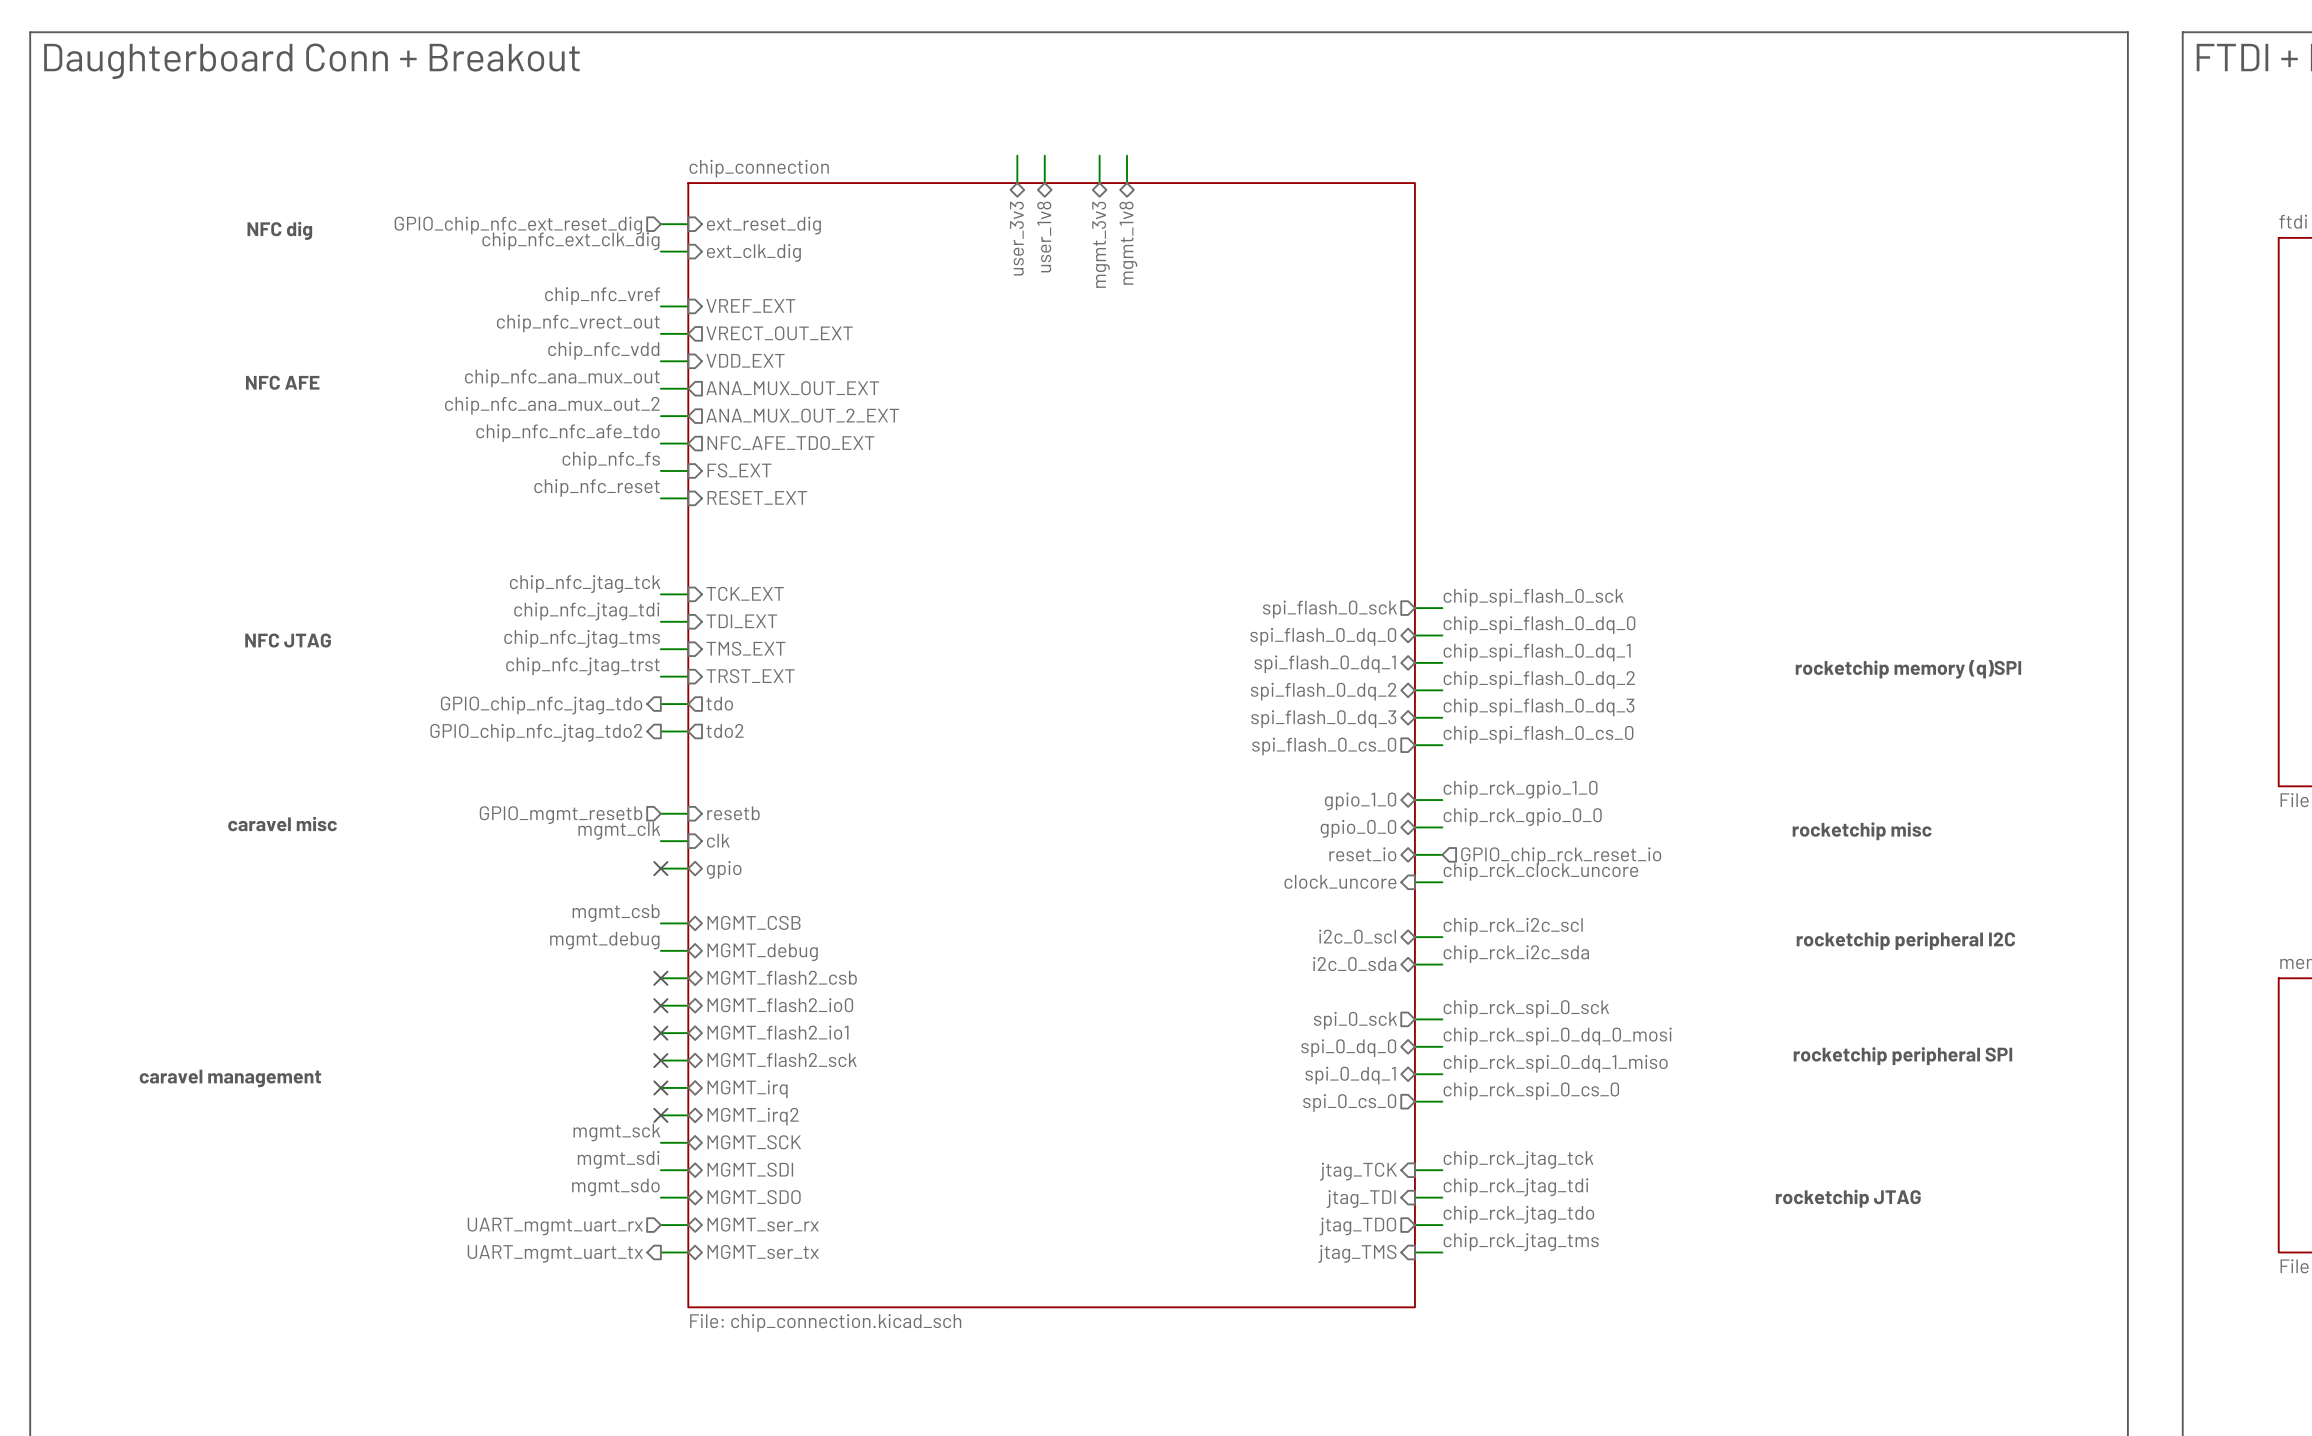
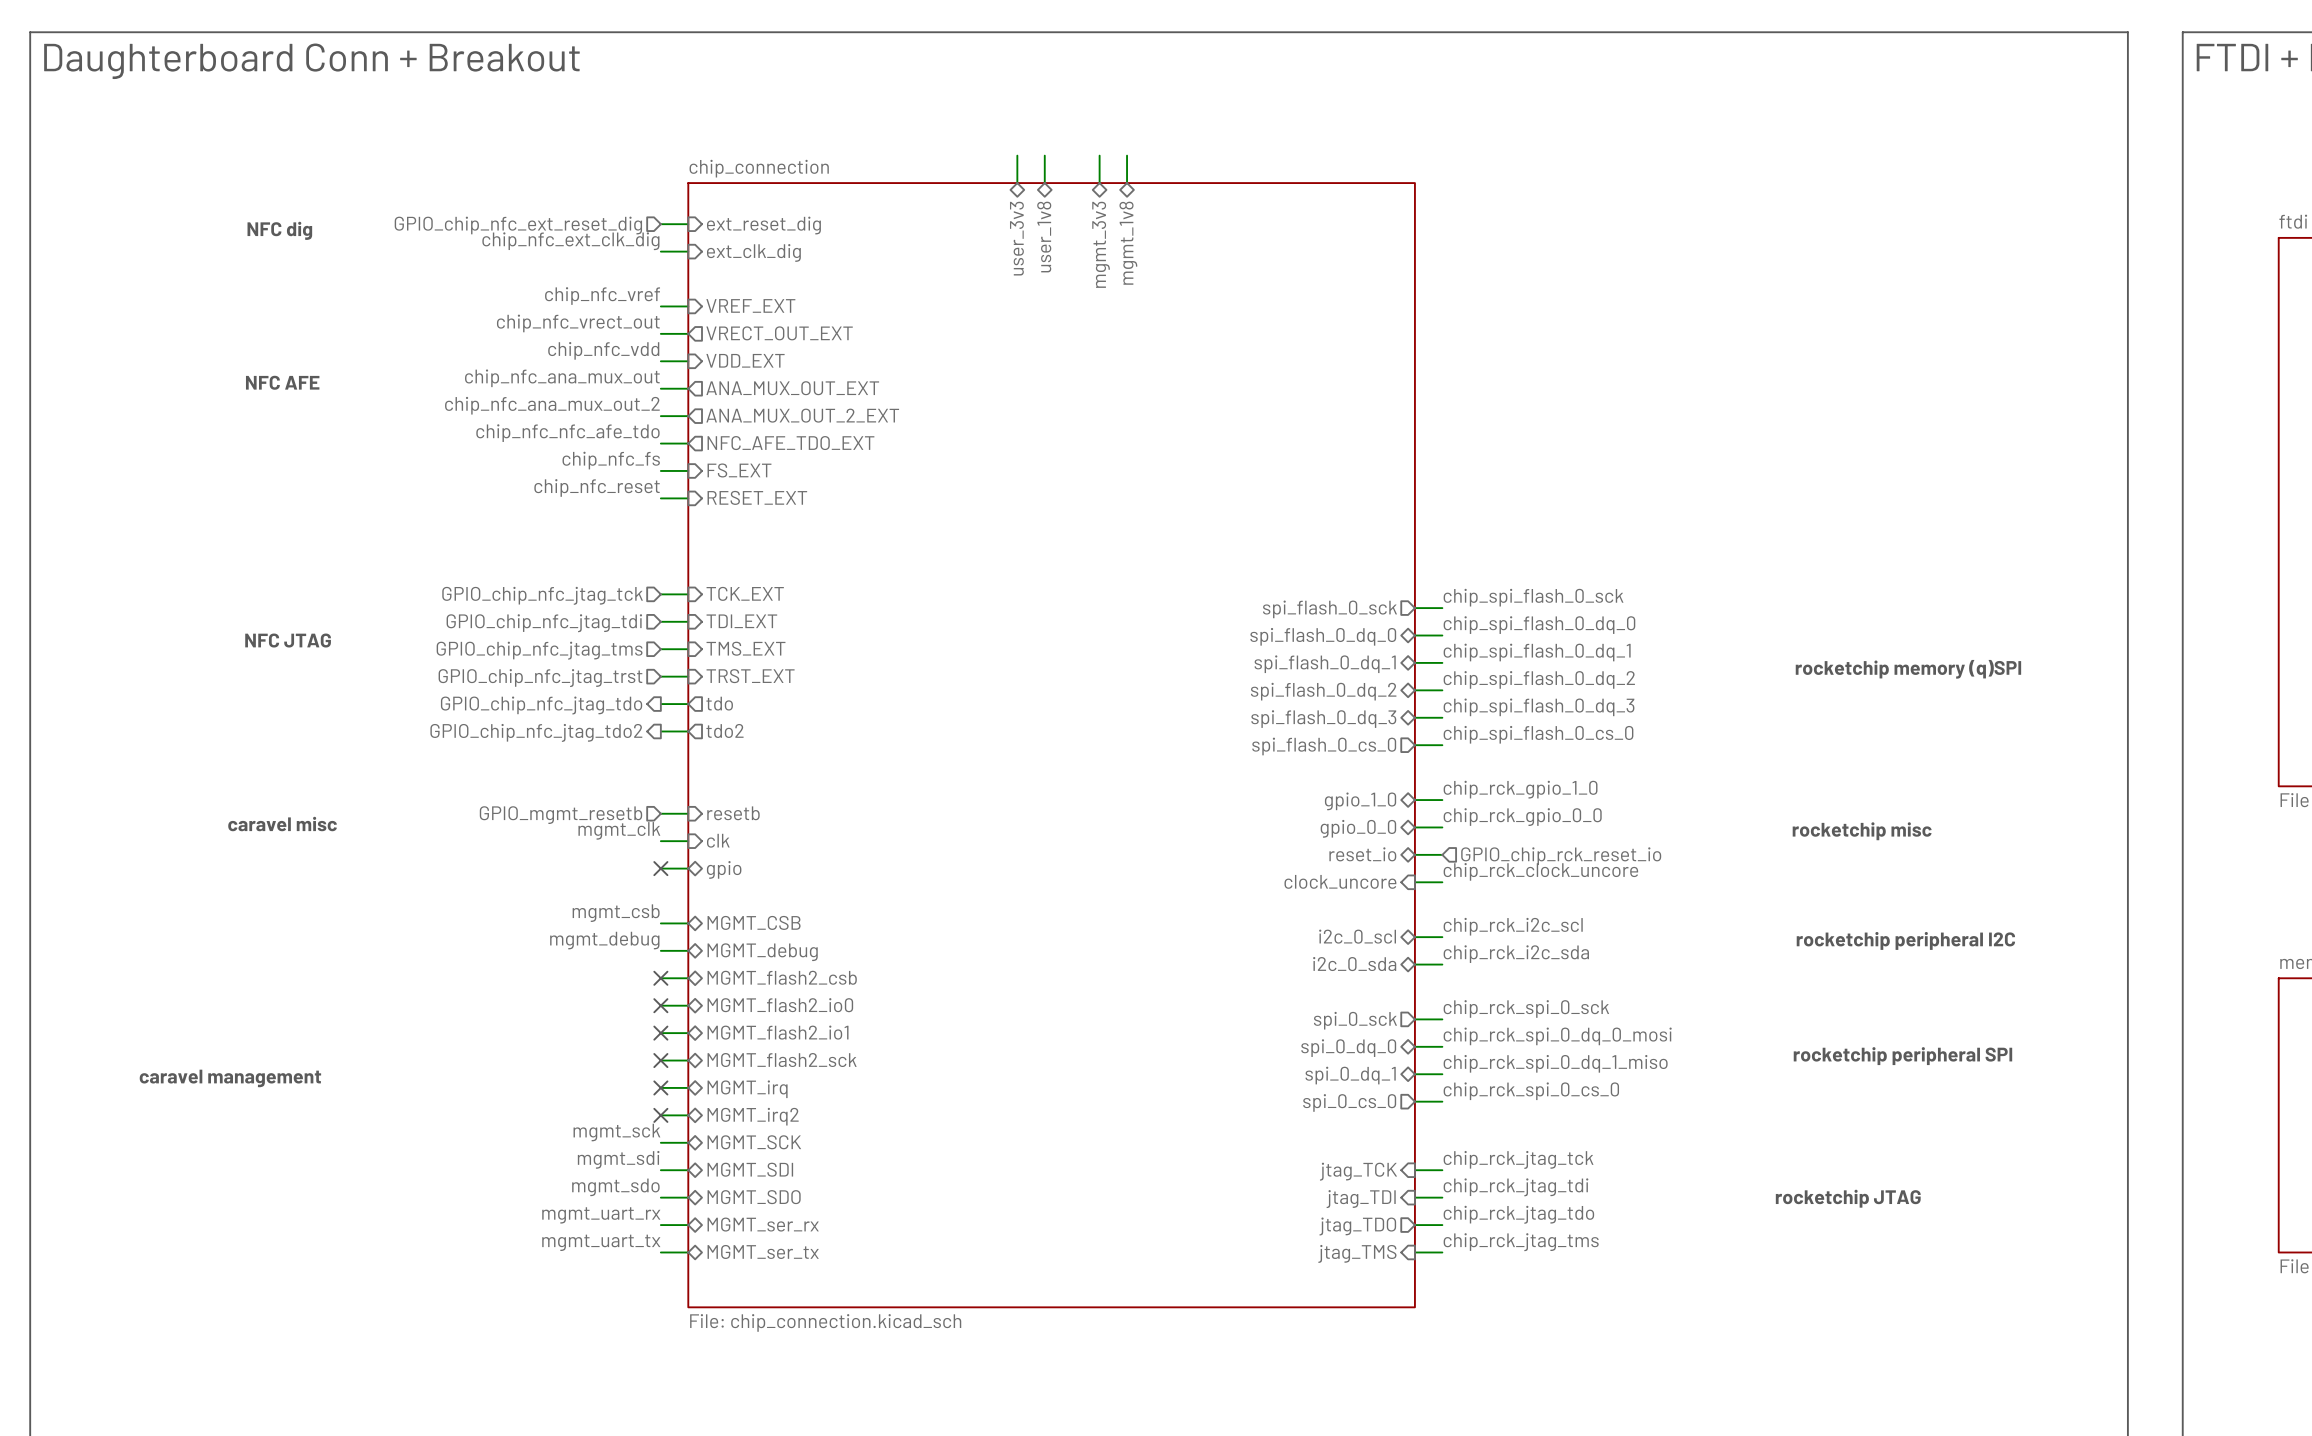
label: chip_nfc_jtag_tck (585, 584) -> none
hierarchical label: none -> GPIO_chip_nfc_jtag_tck (542, 595)
label: chip_nfc_jtag_tdi (586, 611) -> none
hierarchical label: none -> GPIO_chip_nfc_jtag_tdi (544, 623)
label: chip_nfc_jtag_tms (582, 638) -> none
hierarchical label: none -> GPIO_chip_nfc_jtag_tms (539, 650)
label: chip_nfc_jtag_trst (582, 666) -> none
hierarchical label: none -> GPIO_chip_nfc_jtag_trst (540, 678)
label: none -> mgmt_uart_rx (601, 1215)
hierarchical label: UART_mgmt_uart_rx (555, 1226) -> none
label: none -> mgmt_uart_tx (601, 1242)
hierarchical label: UART_mgmt_uart_tx (555, 1253) -> none

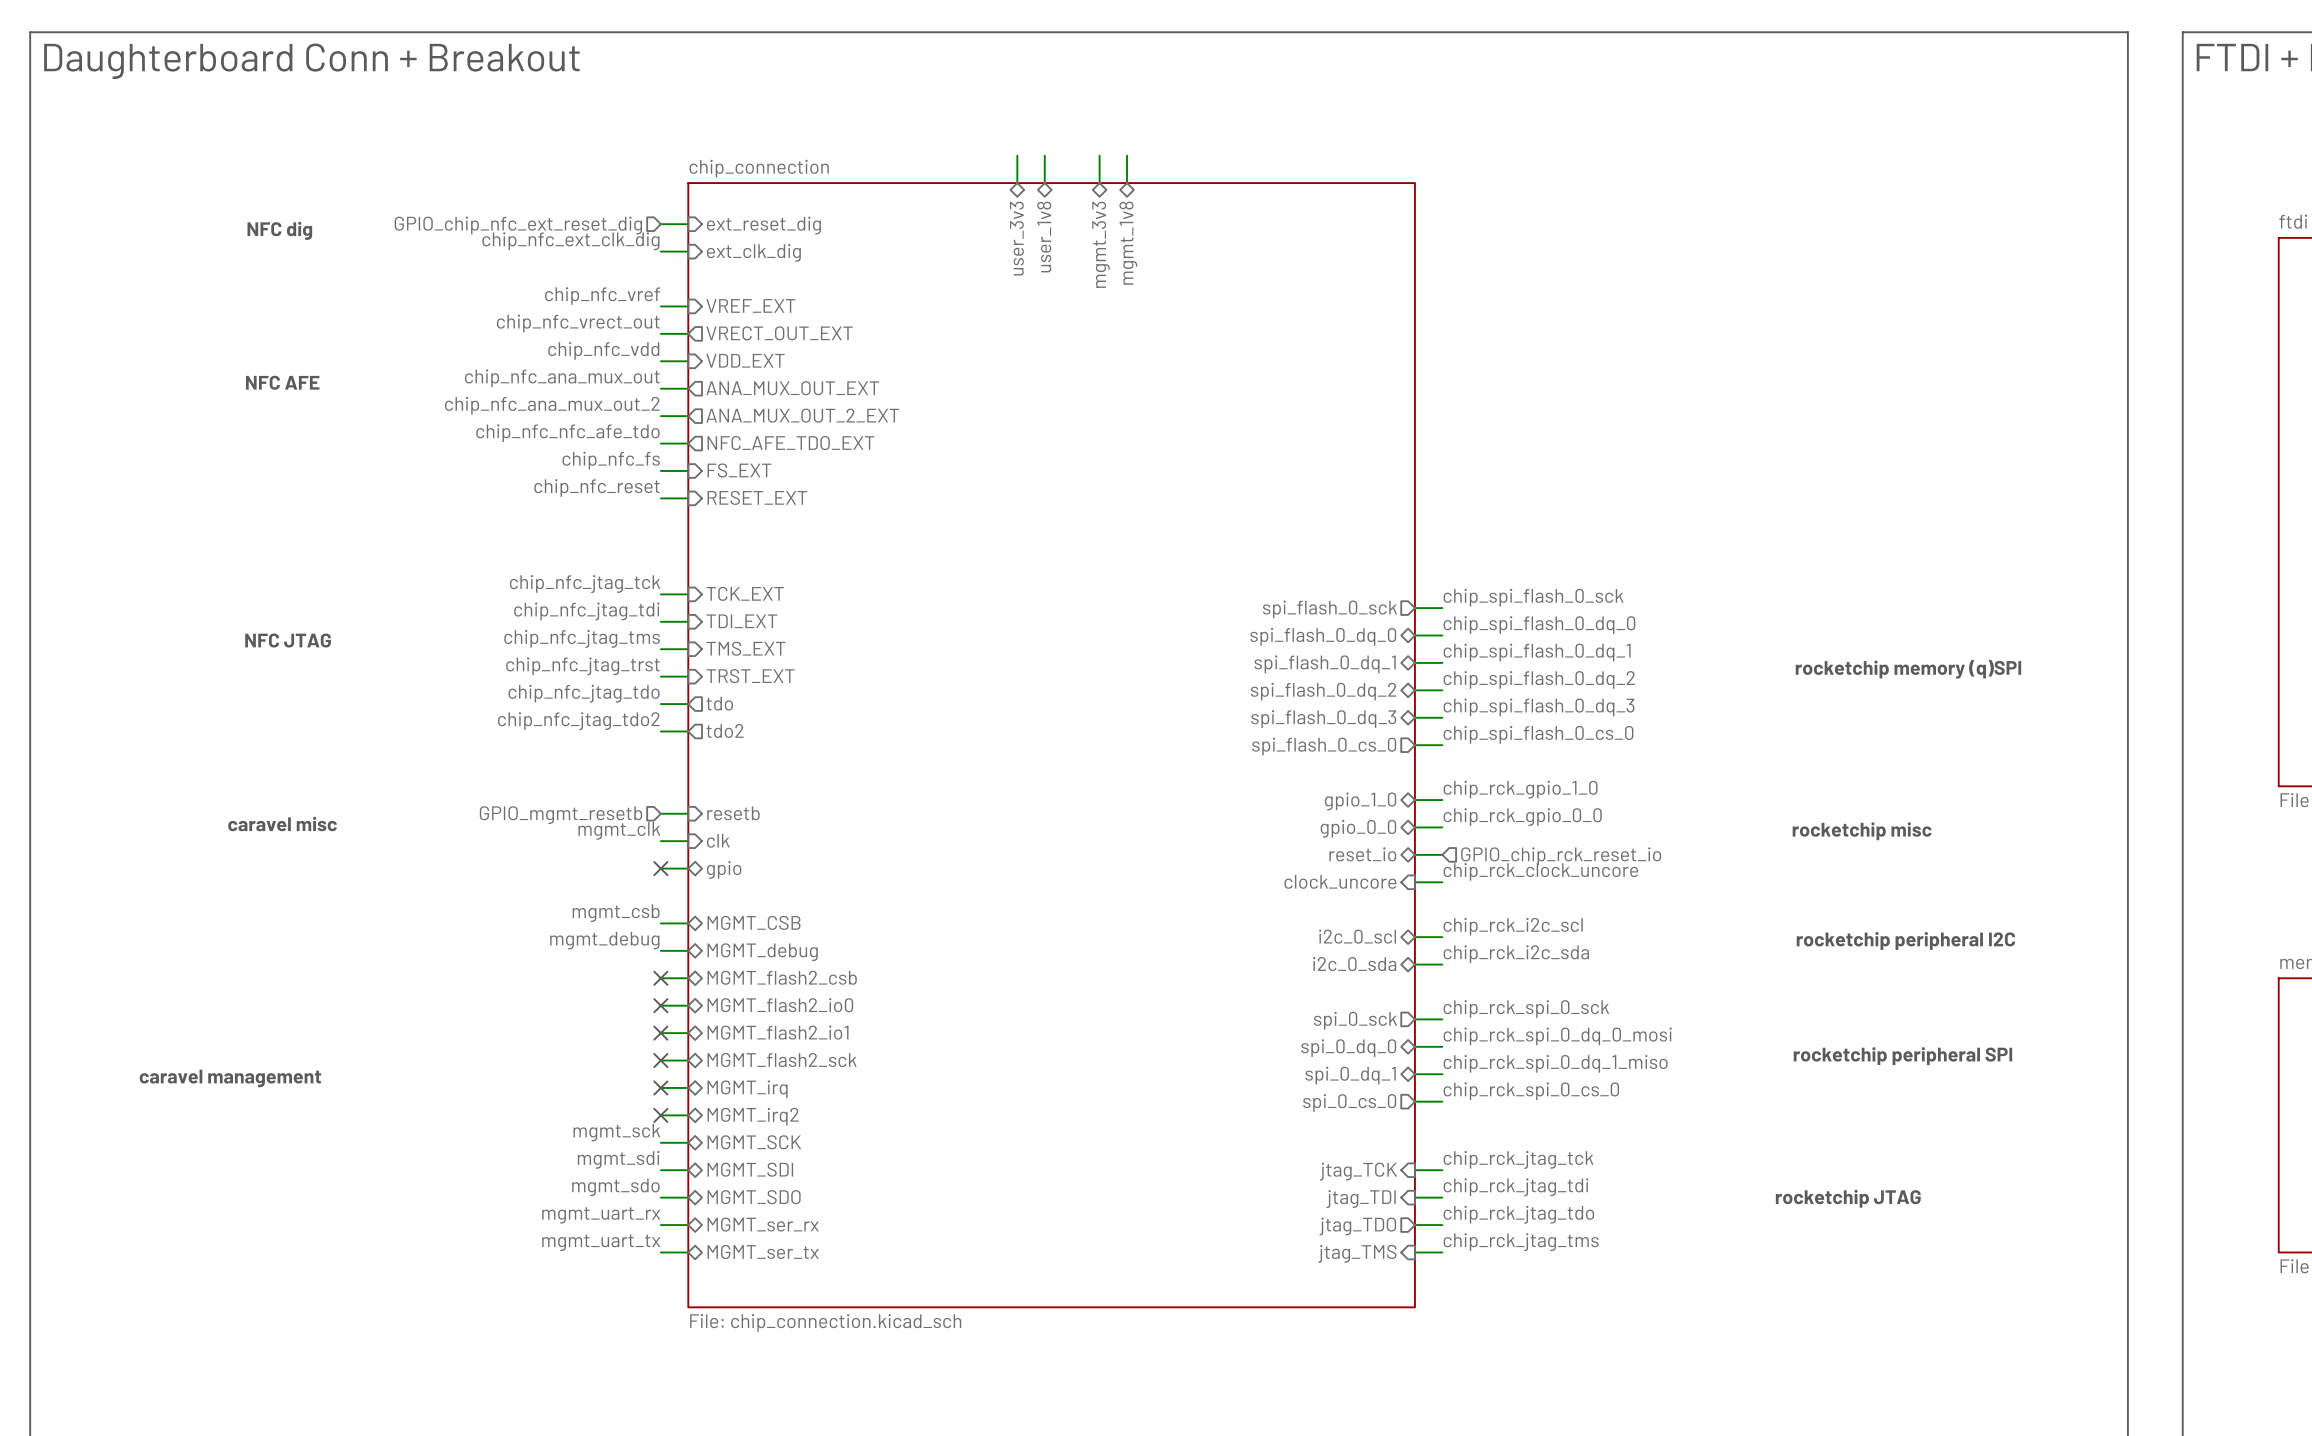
label: none -> chip_nfc_jtag_tck (585, 584)
hierarchical label: GPIO_chip_nfc_jtag_tck (542, 595) -> none
label: none -> chip_nfc_jtag_tdi (586, 611)
hierarchical label: GPIO_chip_nfc_jtag_tdi (544, 623) -> none
label: none -> chip_nfc_jtag_tms (582, 638)
hierarchical label: GPIO_chip_nfc_jtag_tms (539, 650) -> none
label: none -> chip_nfc_jtag_trst (582, 666)
hierarchical label: GPIO_chip_nfc_jtag_trst (540, 678) -> none
label: none -> chip_nfc_jtag_tdo (584, 693)
hierarchical label: GPIO_chip_nfc_jtag_tdo (541, 705) -> none
label: none -> chip_nfc_jtag_tdo2 (578, 721)
hierarchical label: GPIO_chip_nfc_jtag_tdo2 (536, 732) -> none

